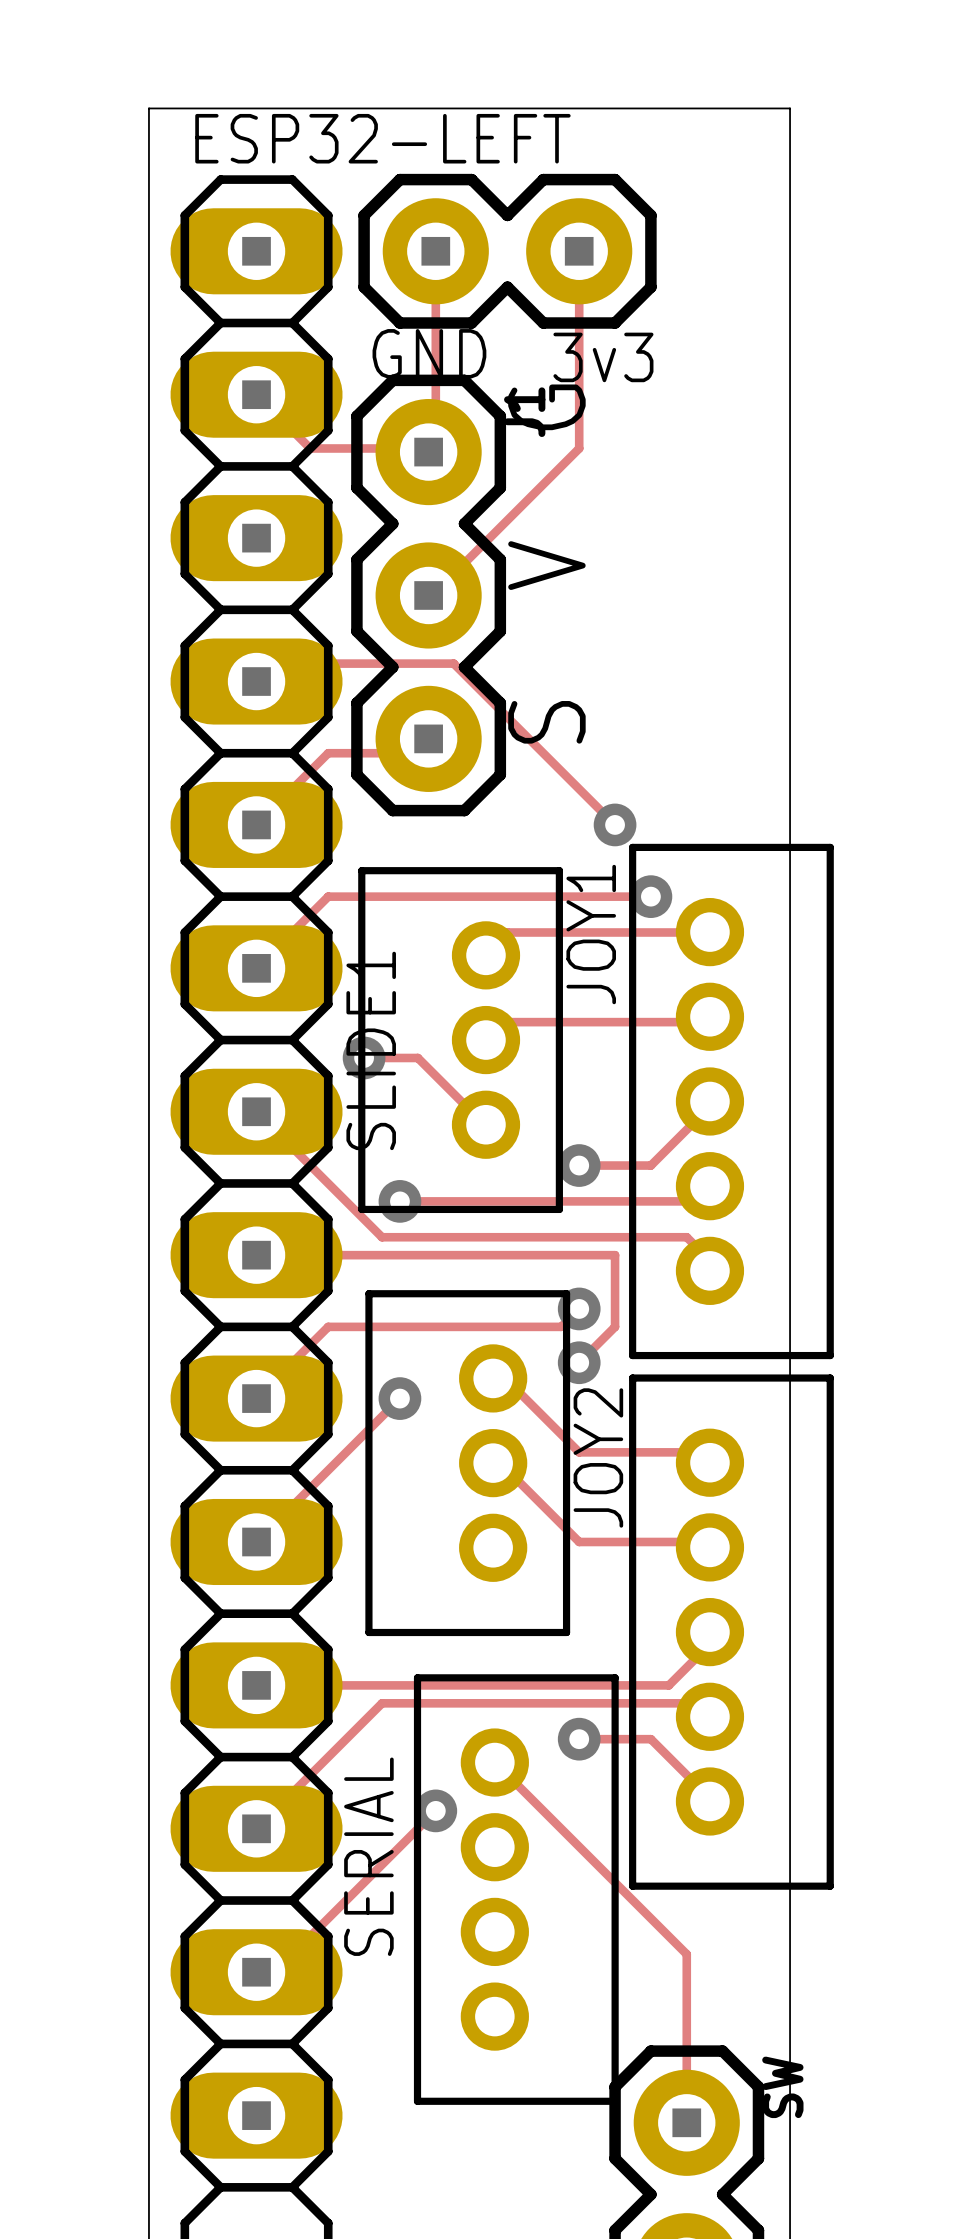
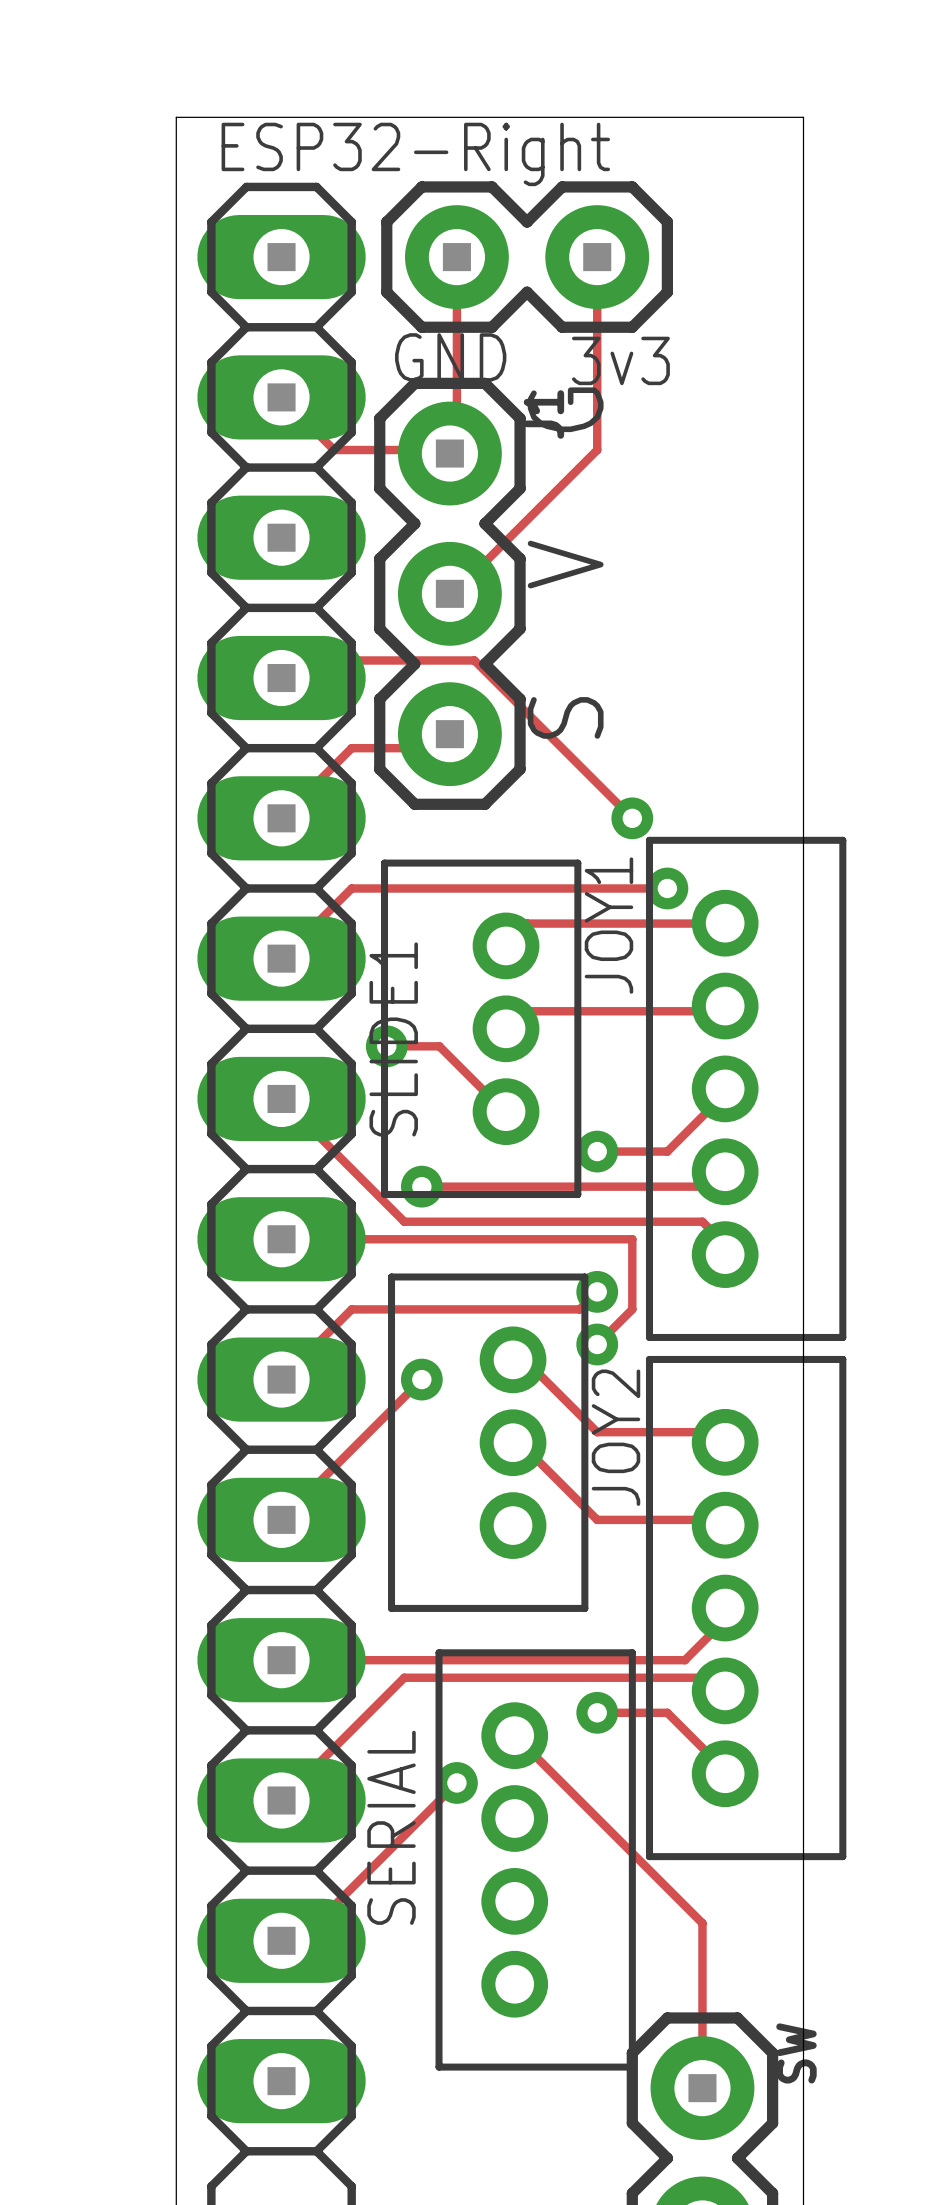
text: ESP32-LEFT (382, 138) -> ESP32-Right (415, 154)

